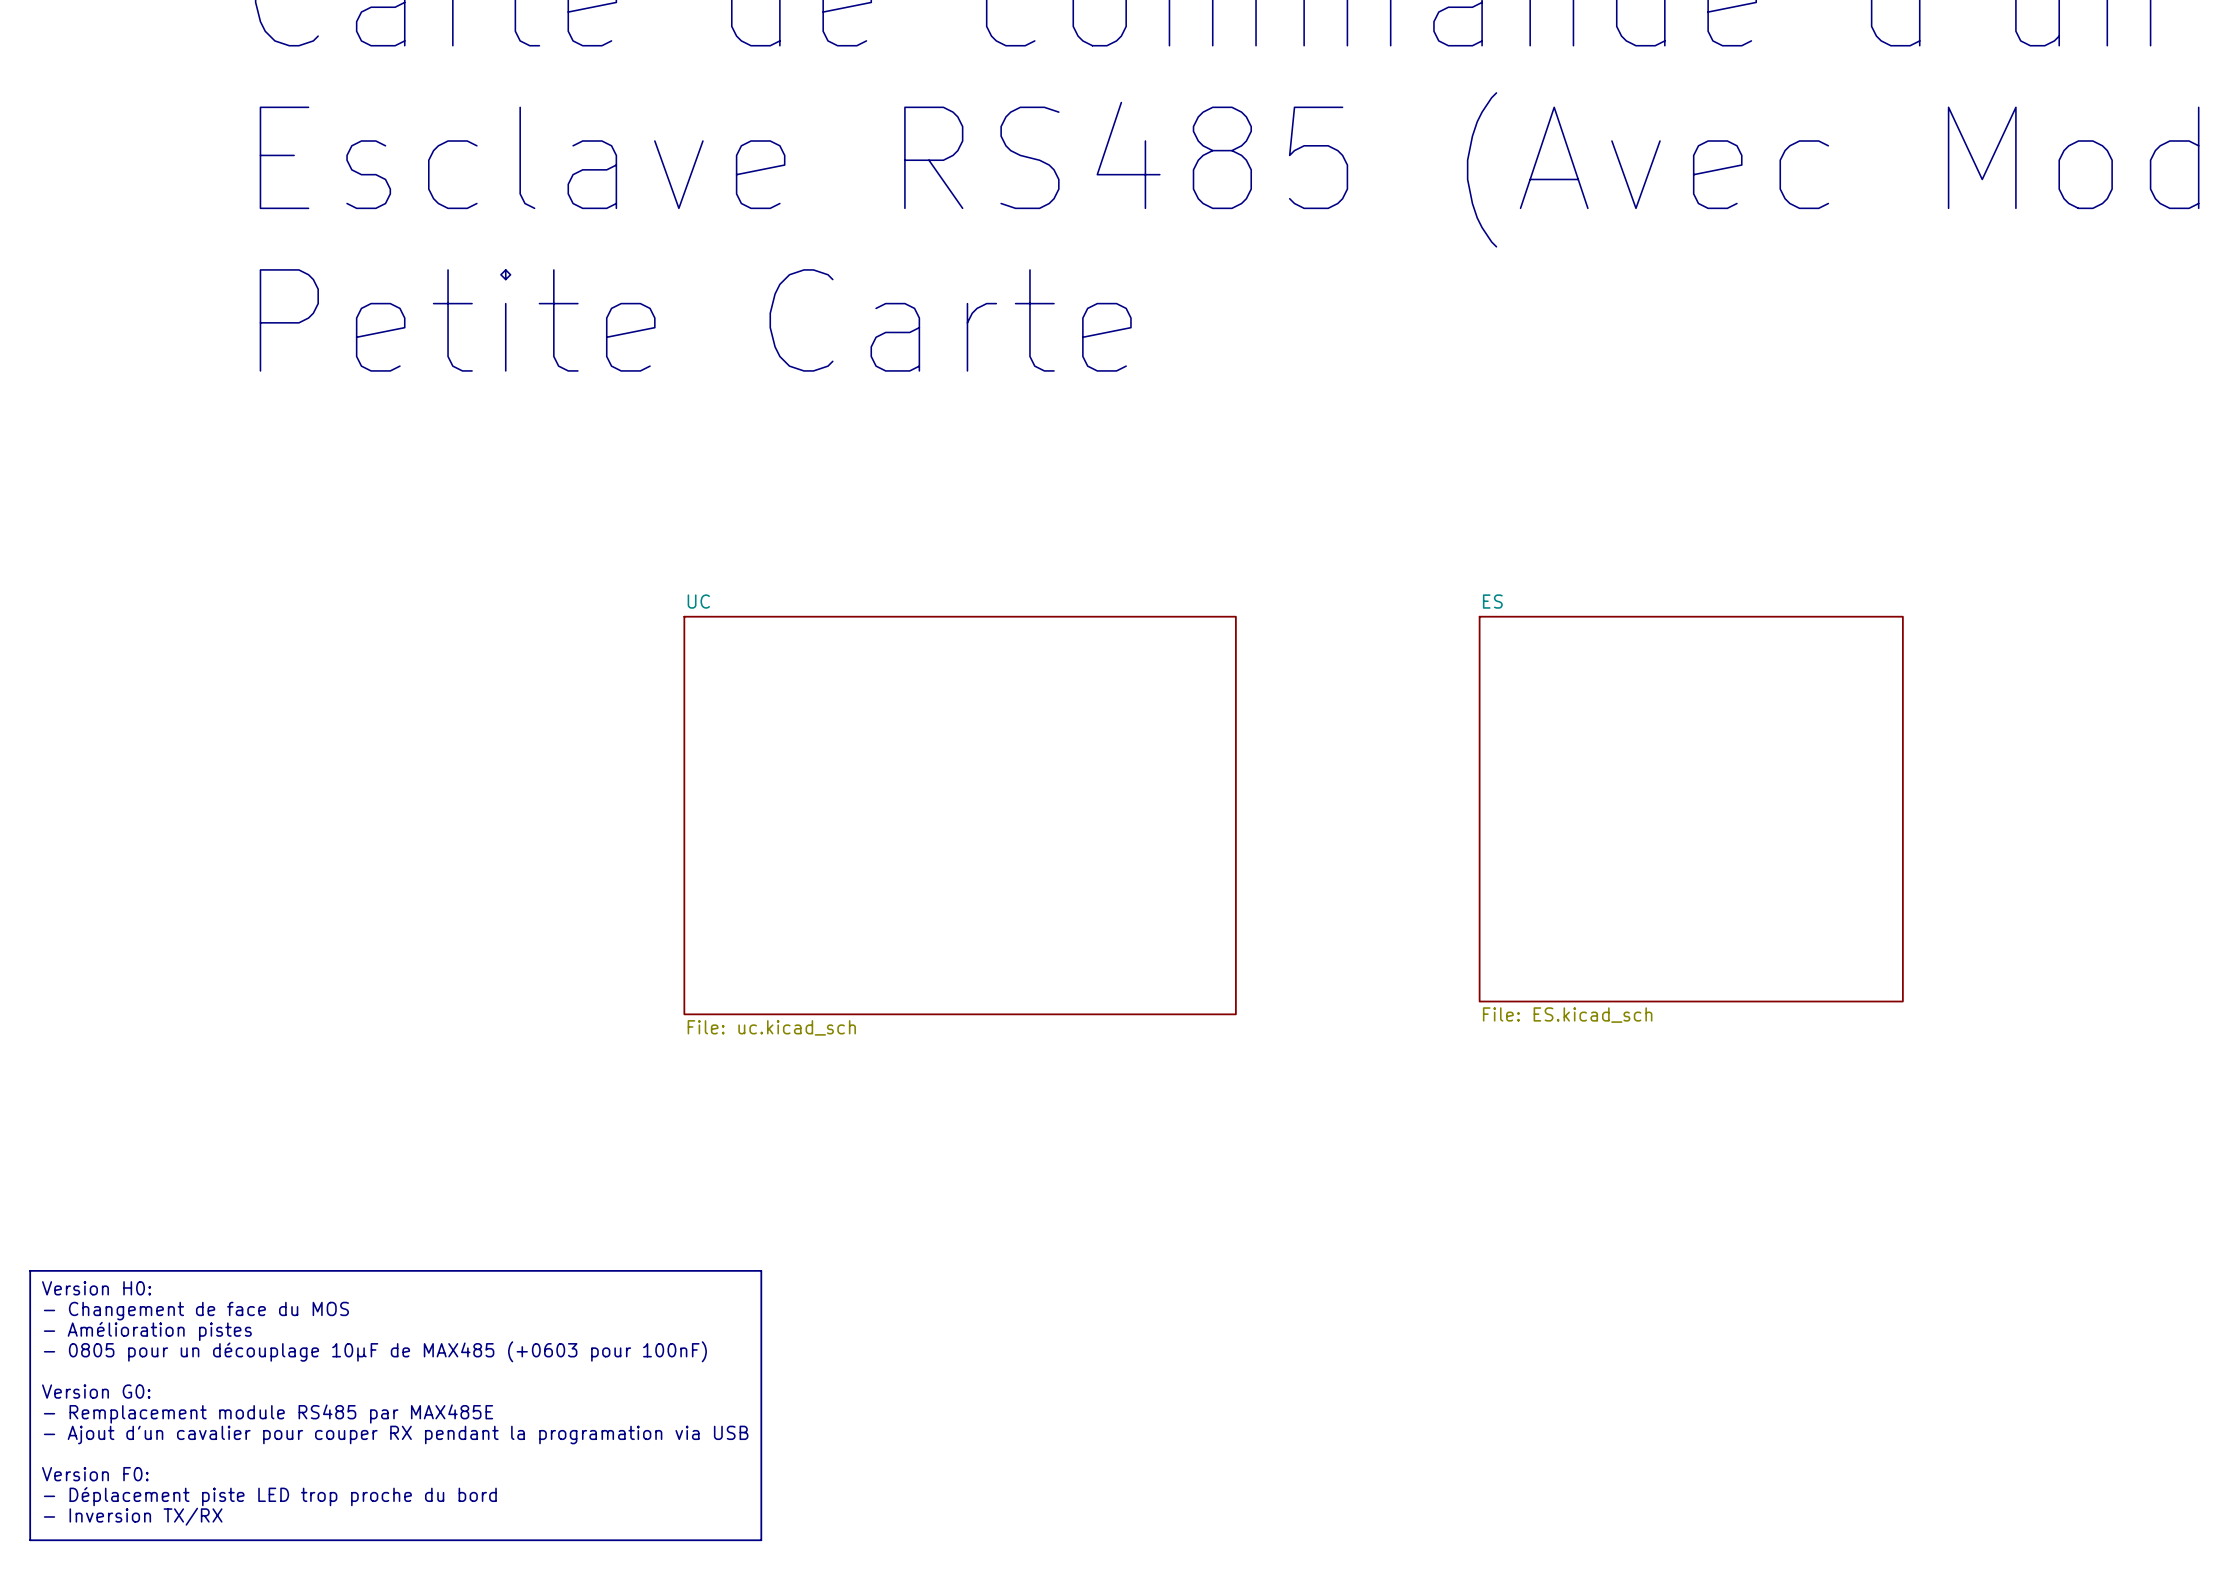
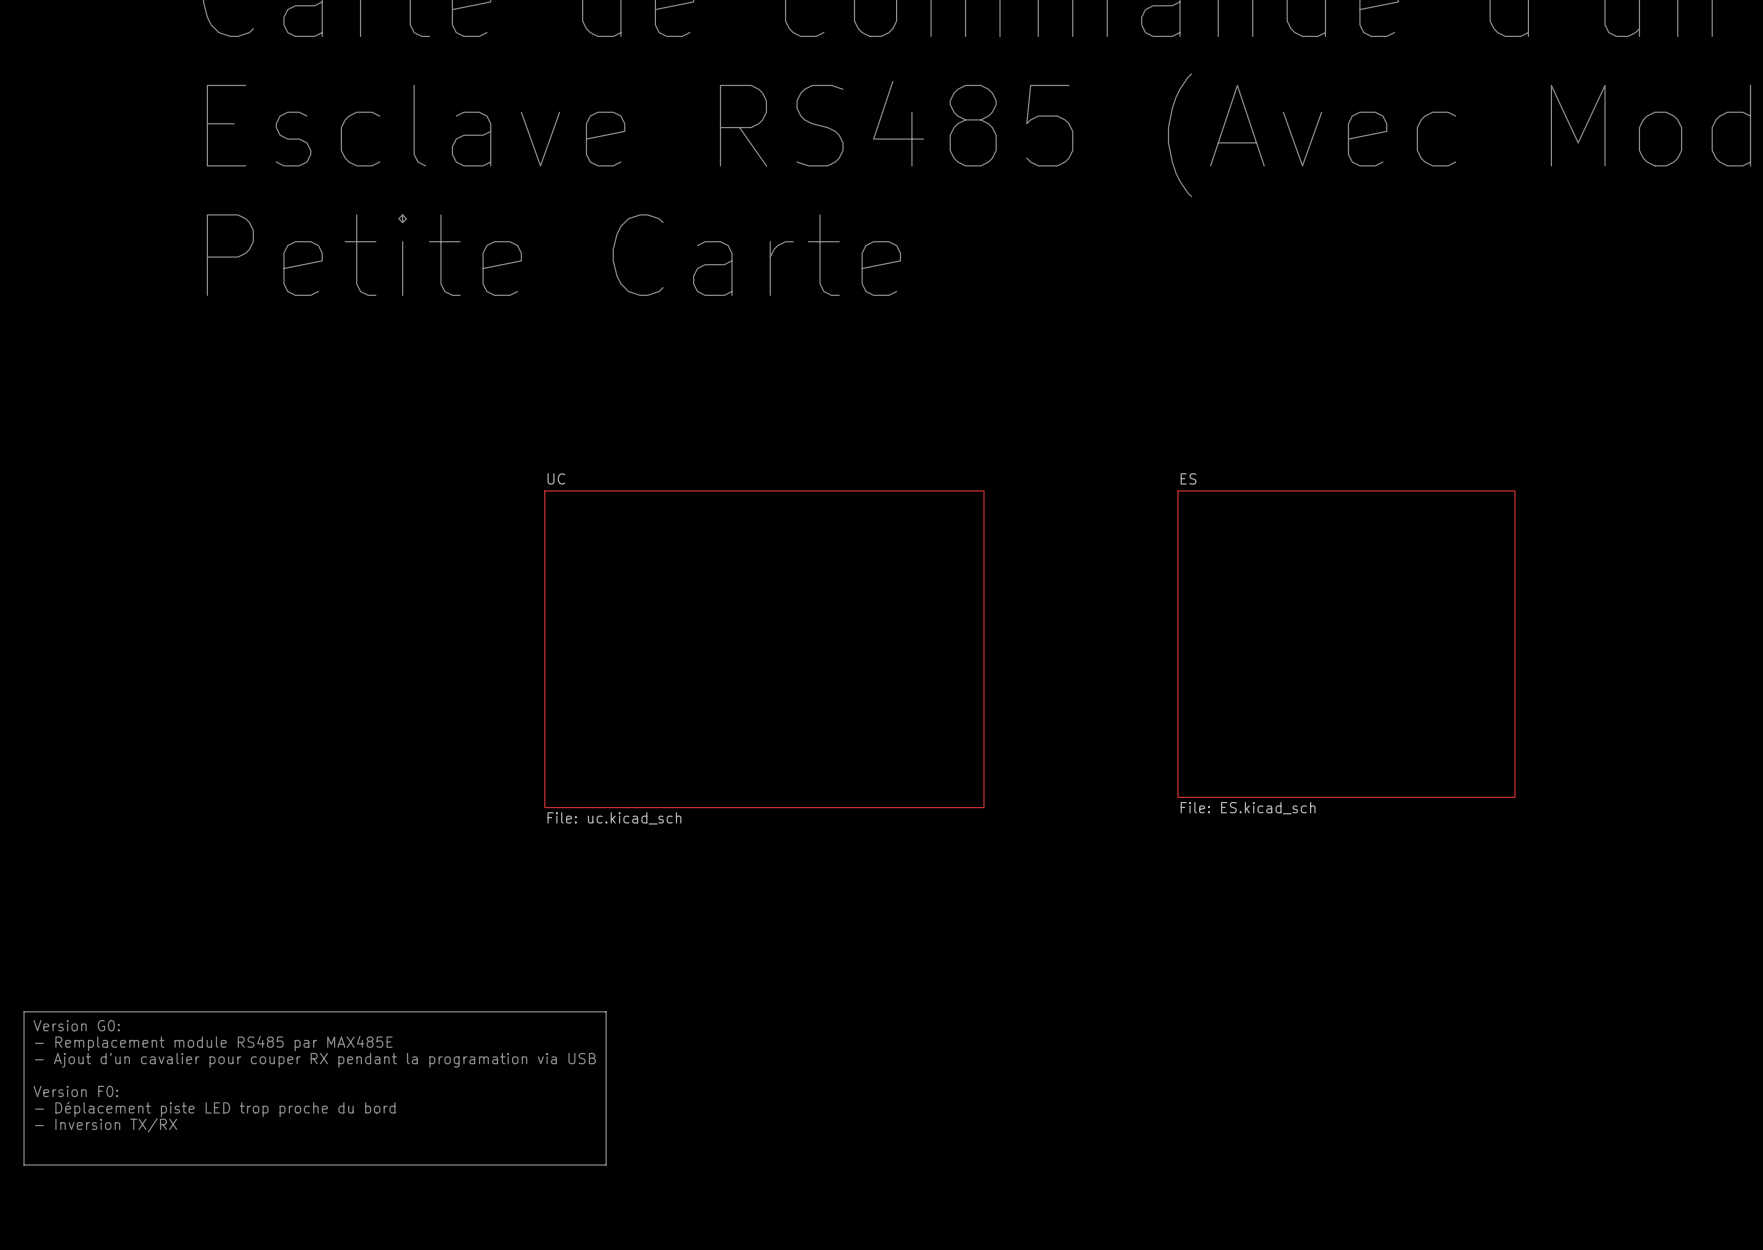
text: Version H0: (96, 1288) -> Version G0: (76, 1025)
text: - Changement de face du MOS (196, 1311) -> - Remplacement module RS485 par MAX485E (213, 1043)
text: - Amélioration pistes (147, 1331) -> - Ajout d'un cavalier pour couper RX pendant la programation via USB (315, 1060)
text: - 0805 pour un découplage 10µF de MAX485 (+0603 pour 100nF) (375, 1351) -> none
text: Version G0: (96, 1391) -> - Déplacement piste LED trop proche du bord (215, 1109)
text: - Remplacement module RS485 par MAX485E (268, 1414) -> - Inversion TX/RX (106, 1125)
text: - Ajout d'un cavalier pour couper RX pendant la programation via USB (396, 1434) -> none
line: (30, 1463) (30, 1540) (761, 1540) (761, 1463) -> (24, 1165) (606, 1165)
text position: Version F0: (95, 1474) -> Version F0: (75, 1091)
text: - Déplacement piste LED trop proche du bord (270, 1496) -> none
text: - Inversion TX/RX (133, 1516) -> none

